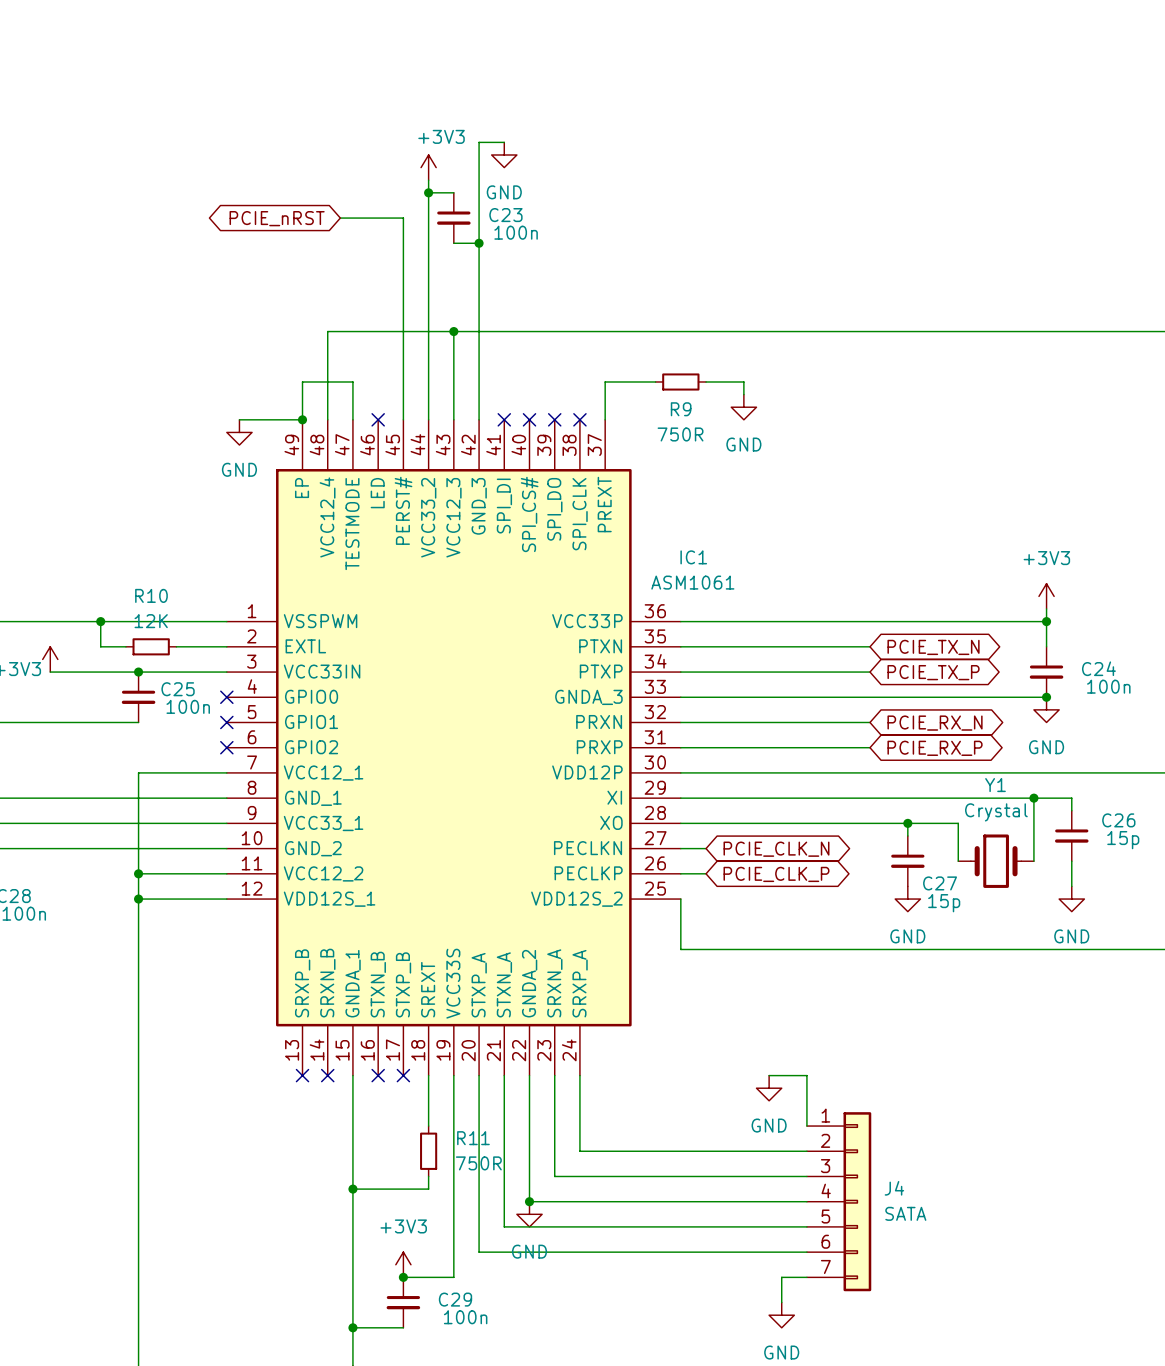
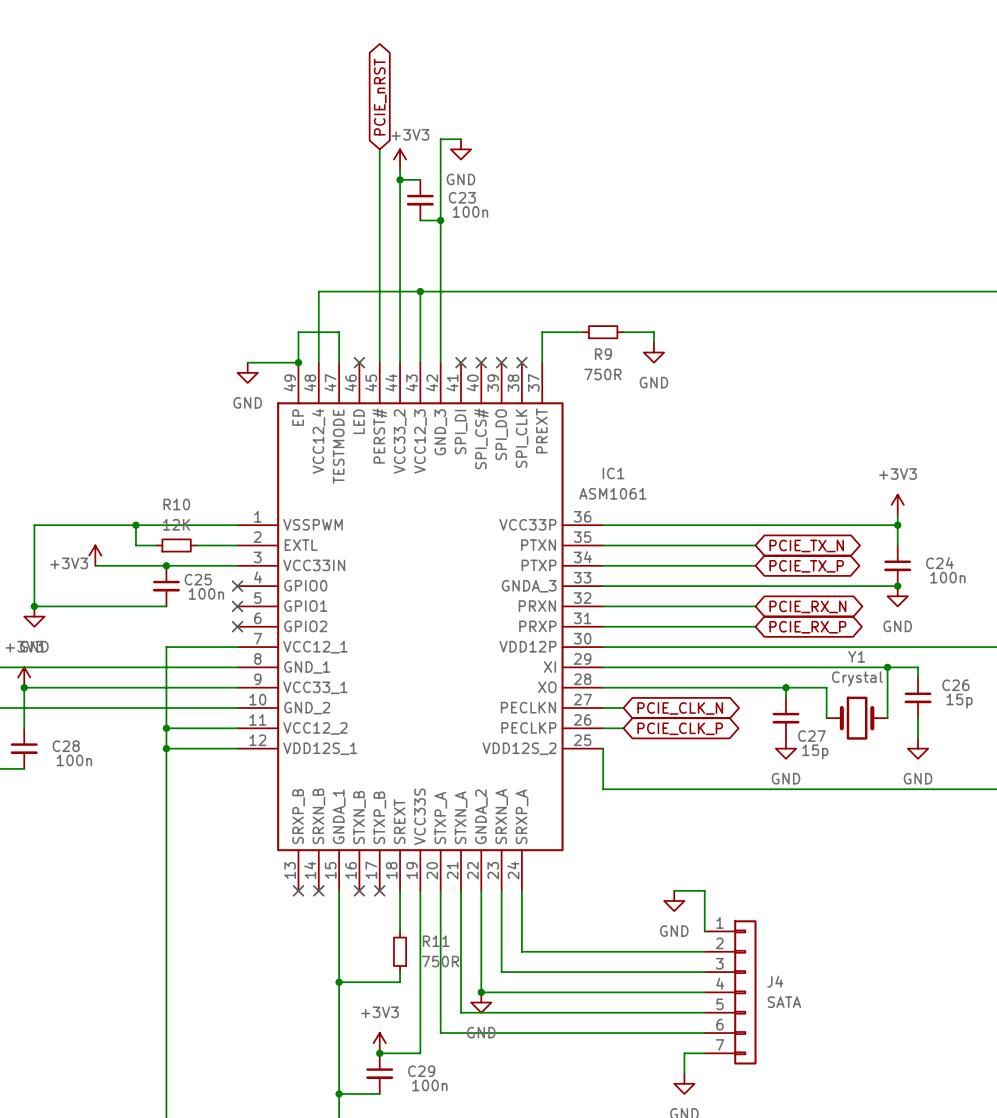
global label rotation: 0° (277, 218) -> 90° clockwise (380, 97)
global label position: PCIE_nRST (277, 218) -> PCIE_nRST (380, 97)
wire: (340, 218) (403, 218) -> (379, 149) (379, 200)

